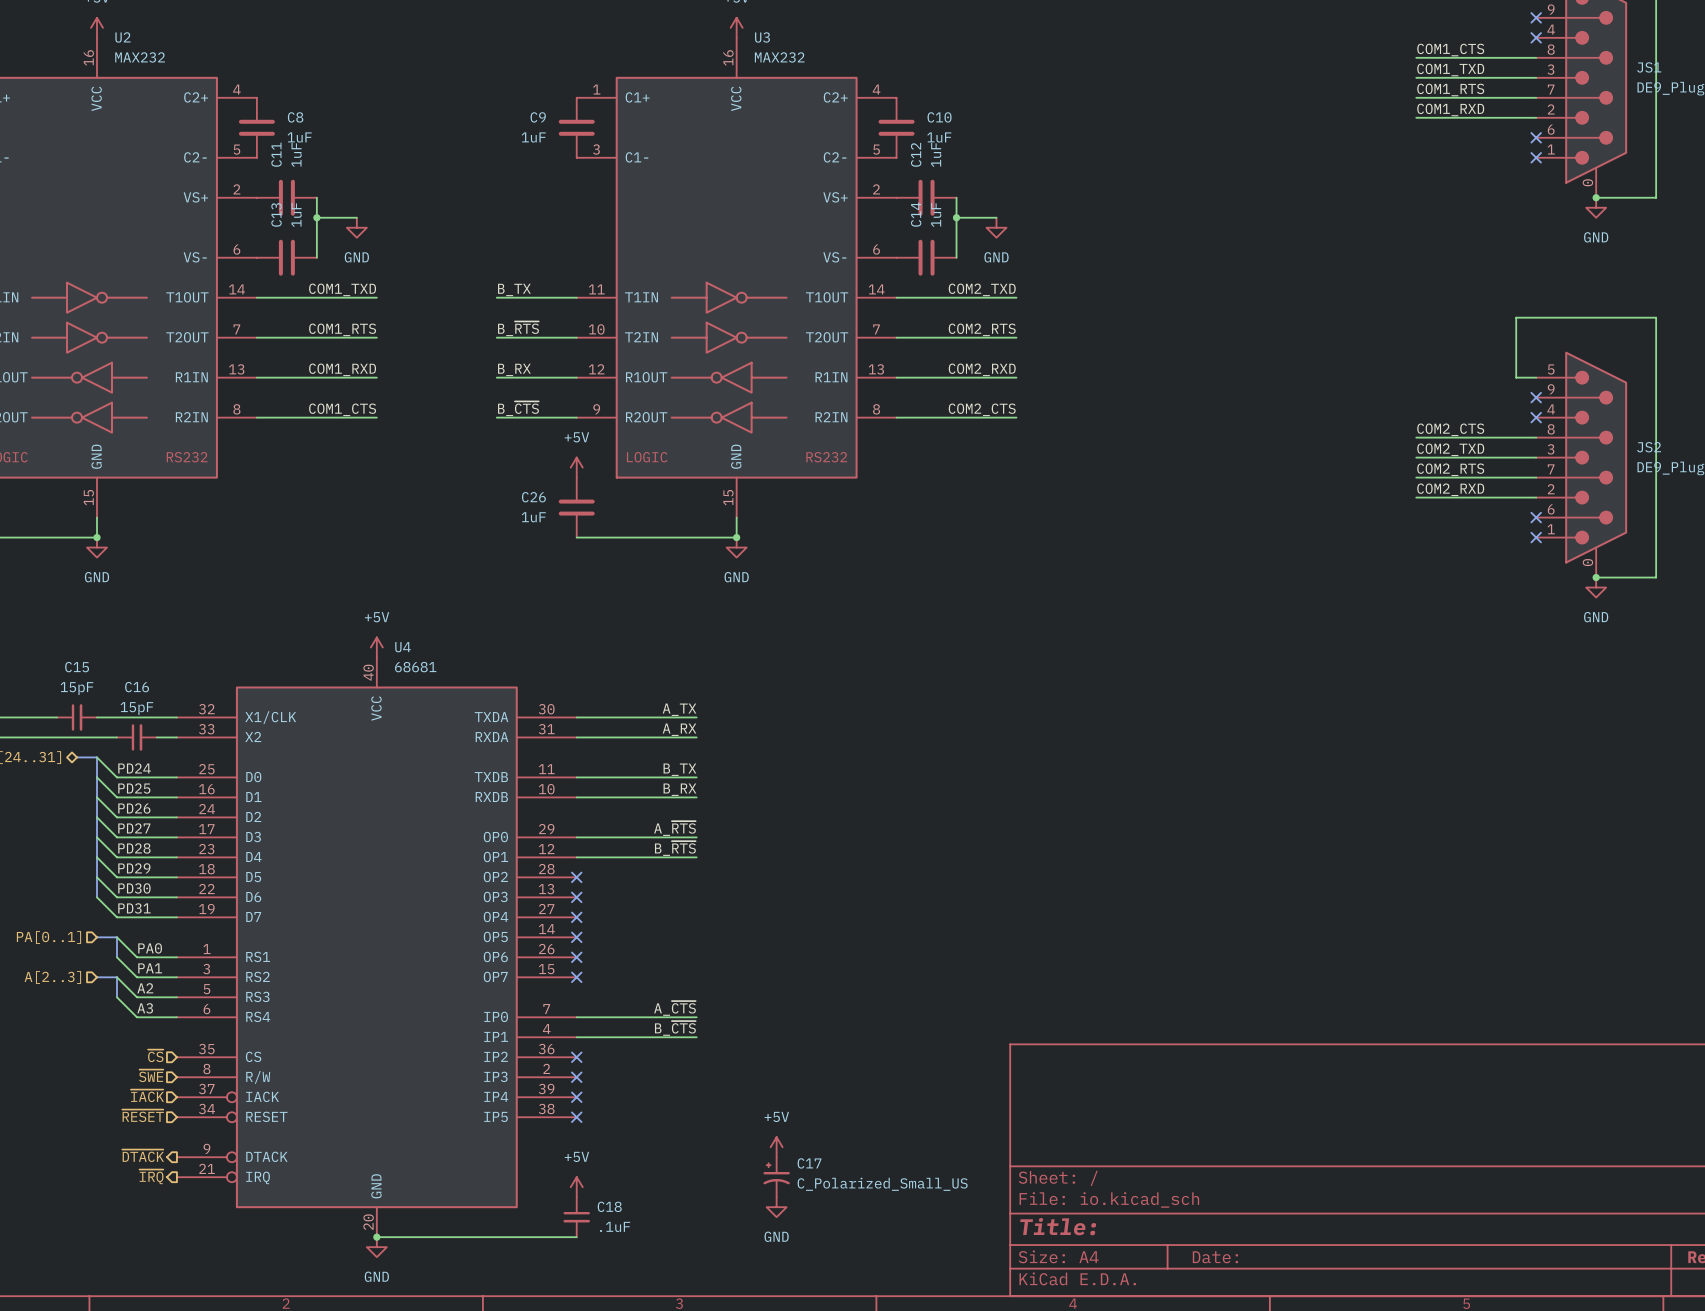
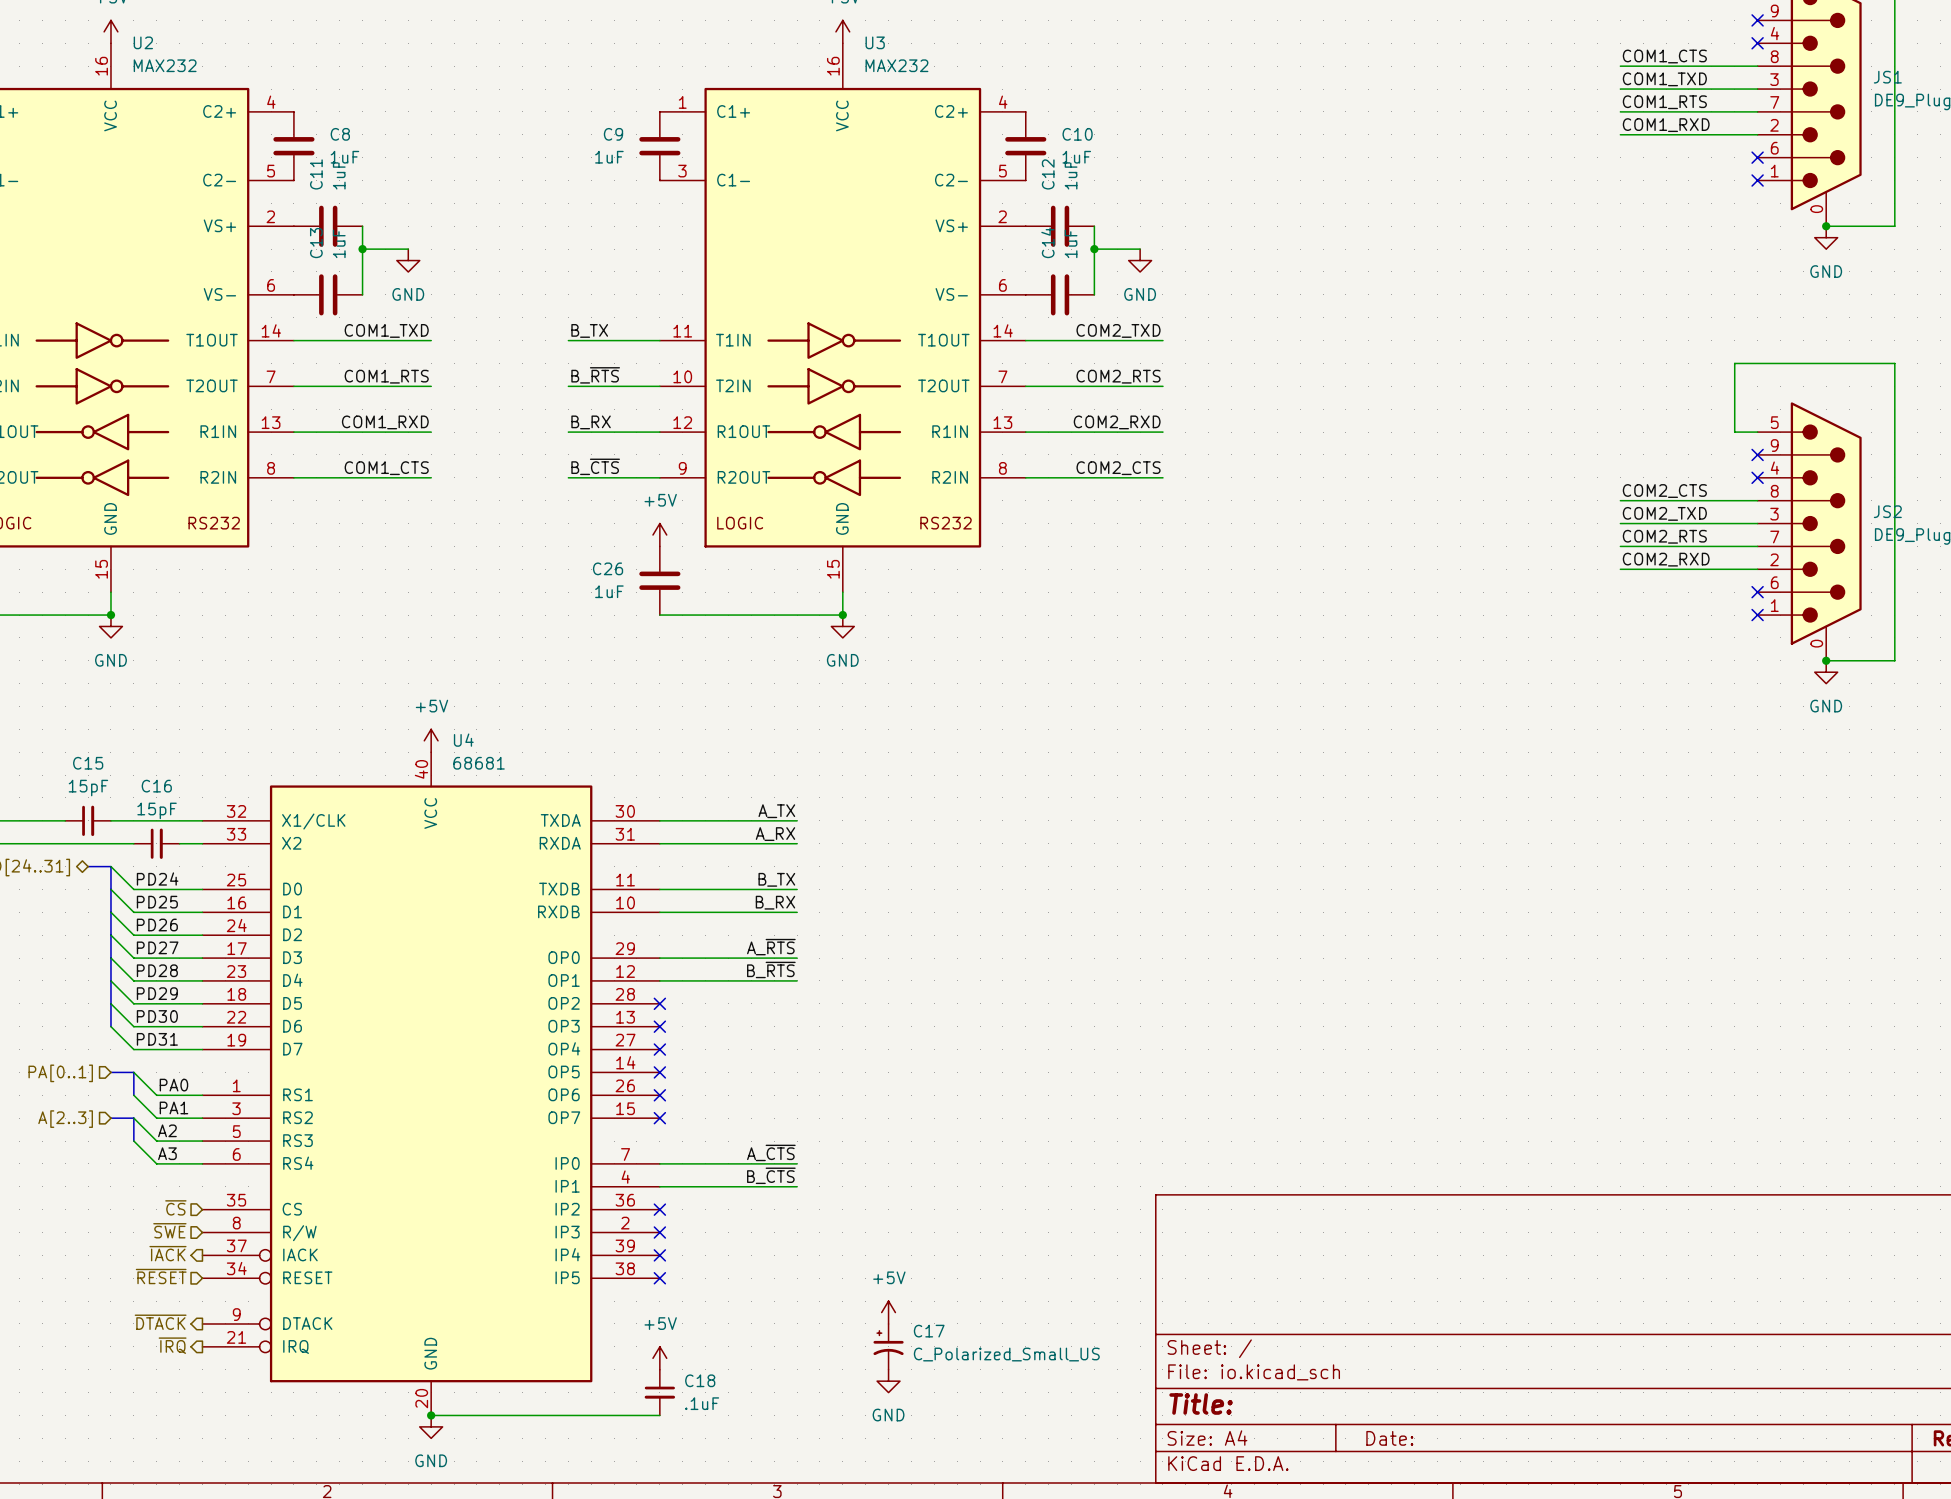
hierarchical label shape: input (147, 1095) -> output (167, 1253)

